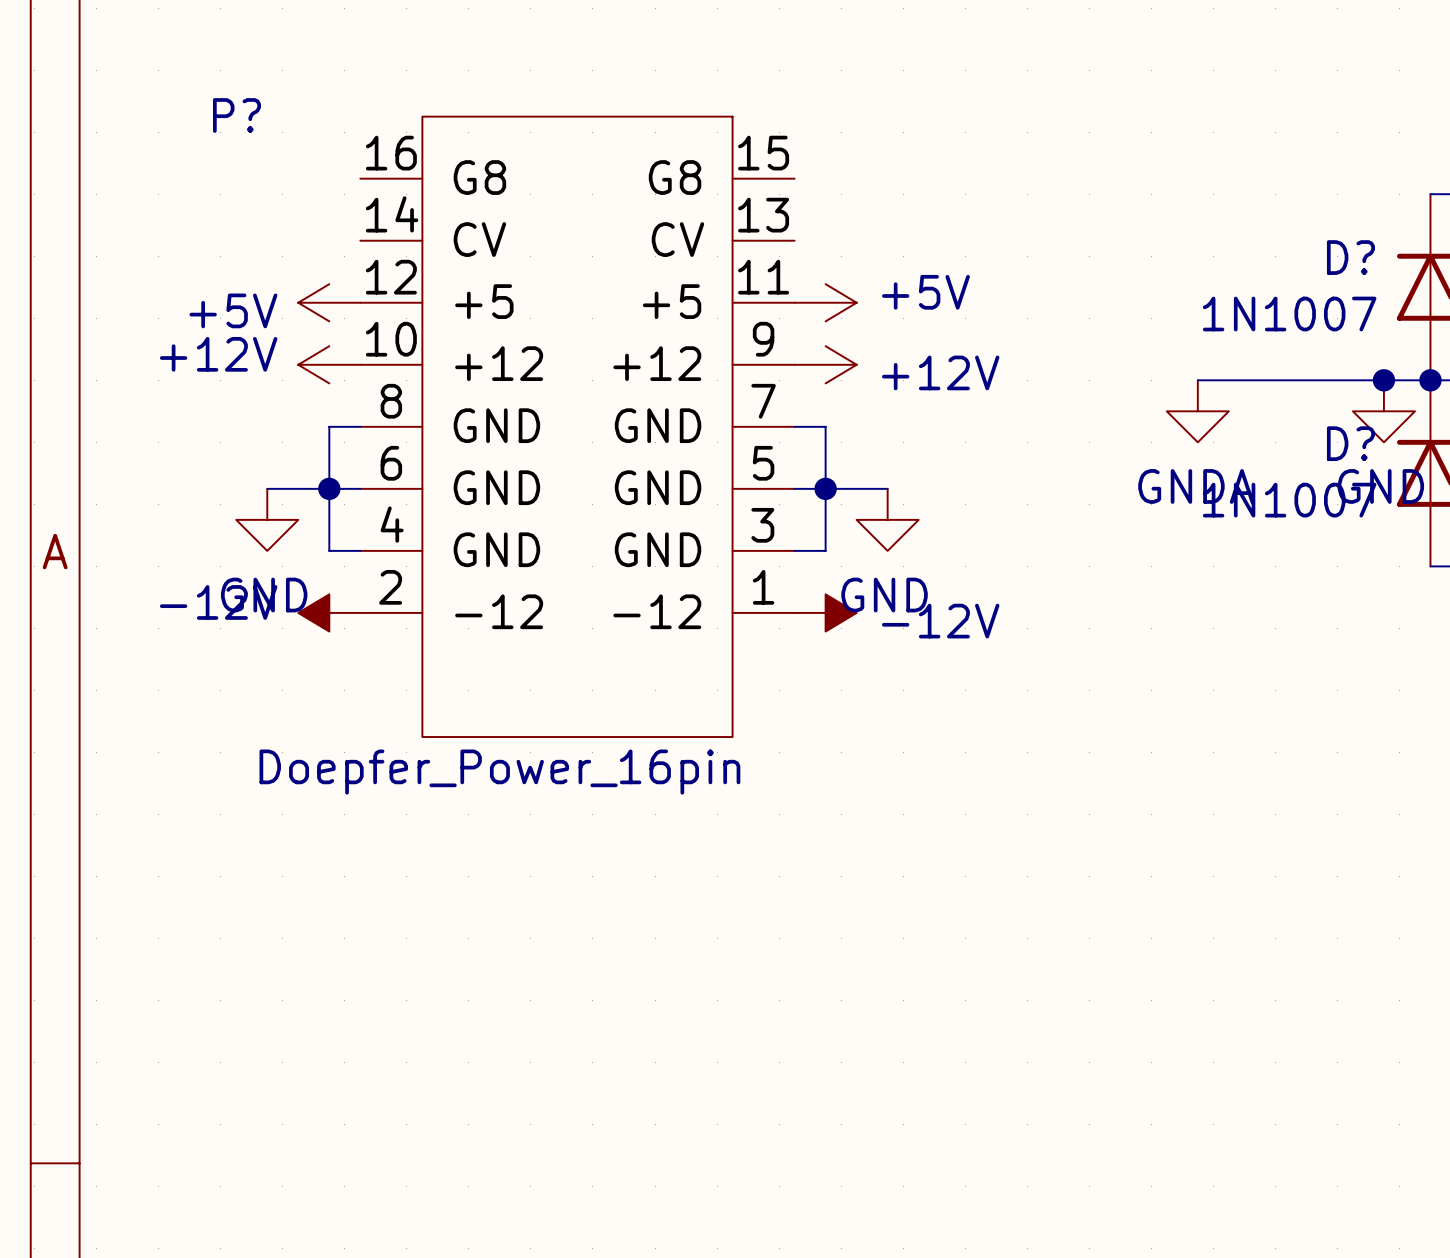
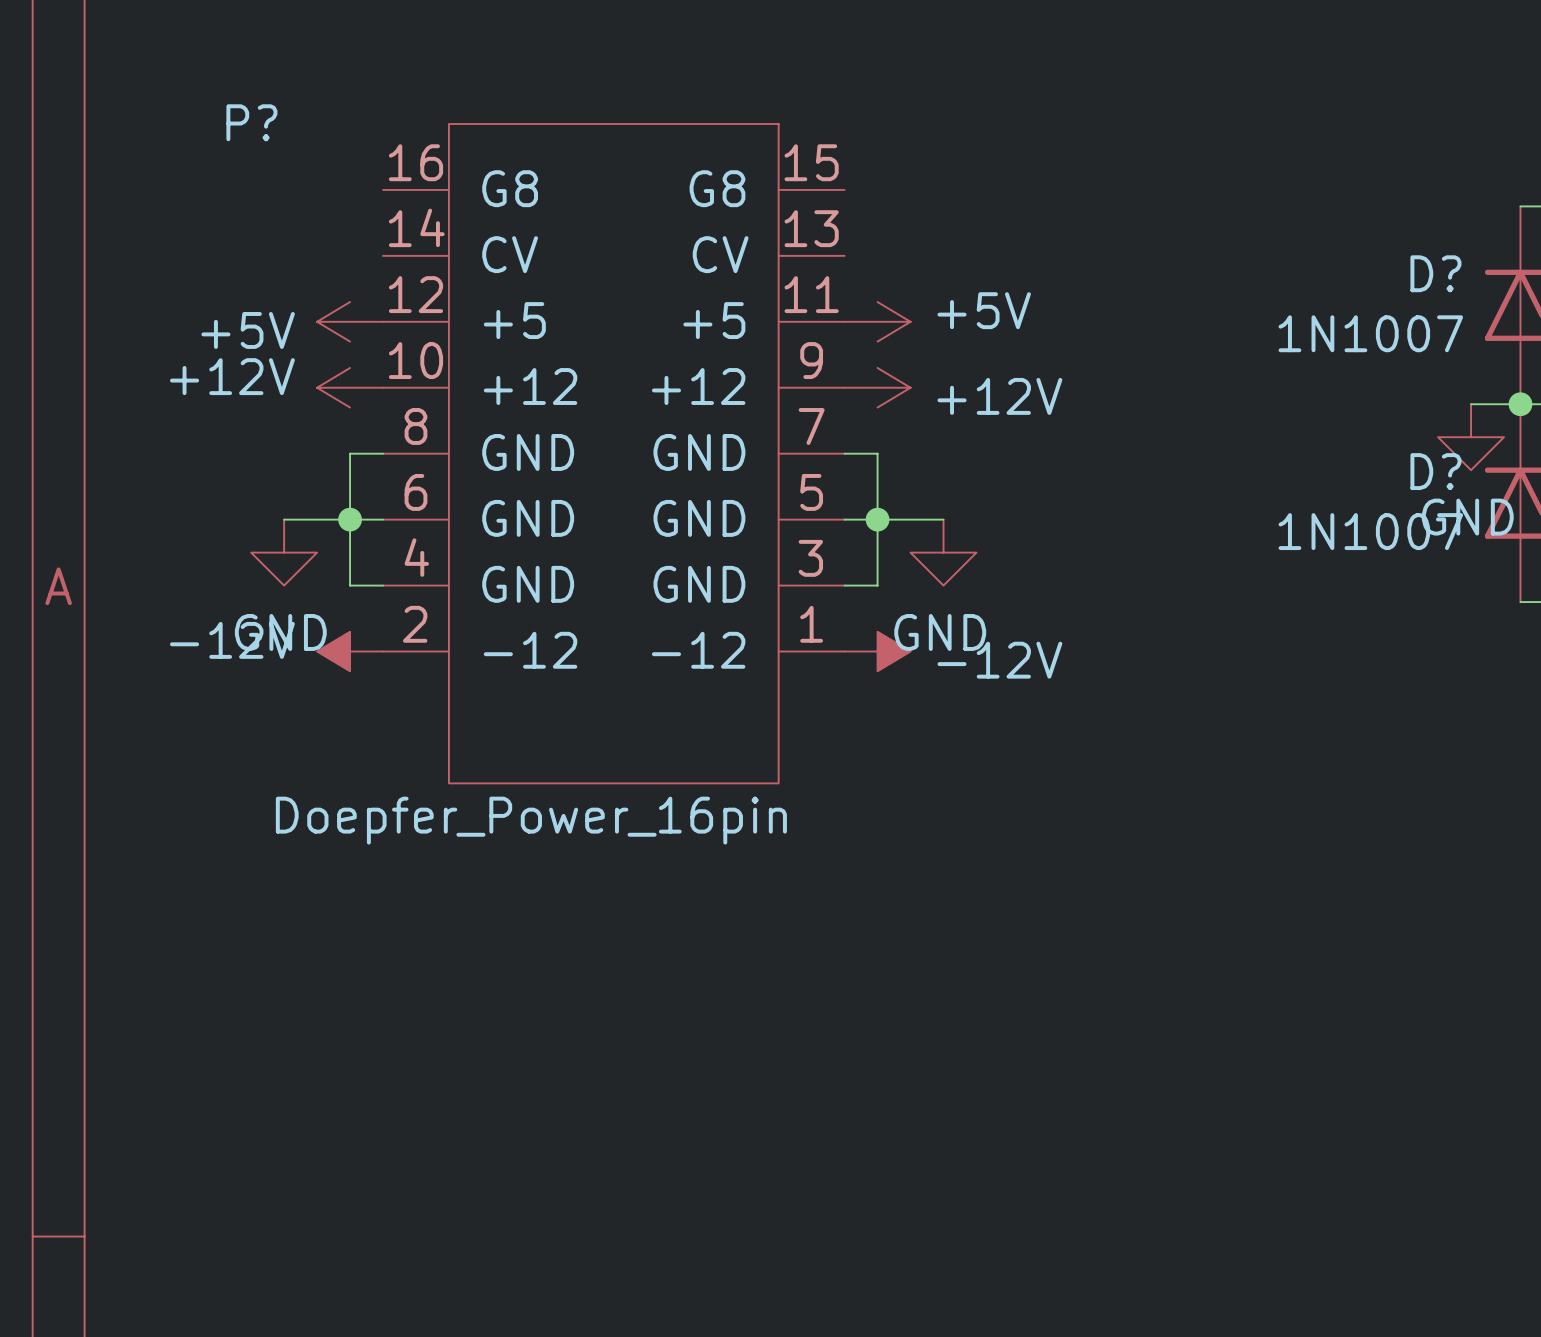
wire: (1197, 380) (1383, 380) -> none
junction: (1383, 380) -> none
power symbol: GNDA (1197, 411) -> none

